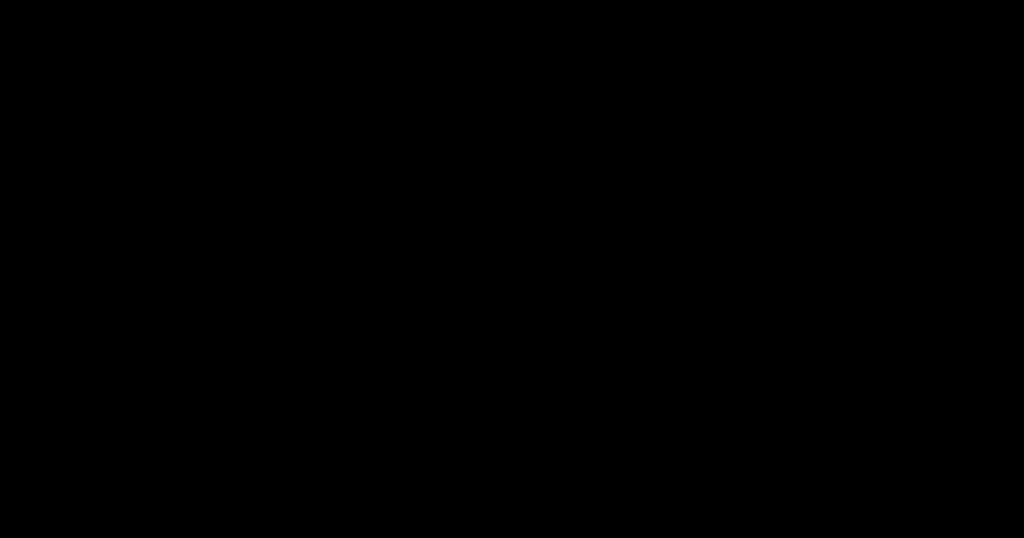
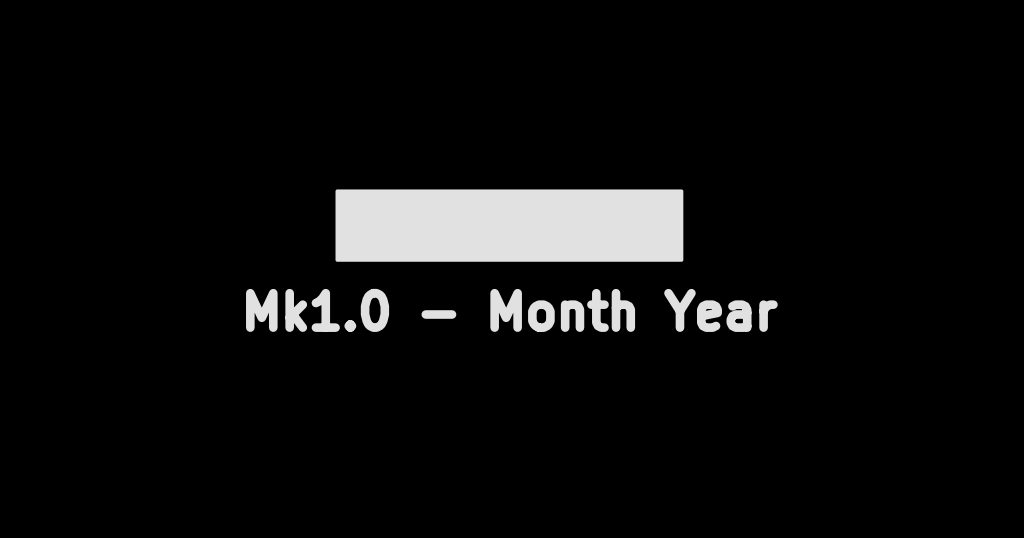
drawing: none -> [335, 189, 684, 262]
text: none -> Mk1.0 - Month Year (511, 310)

